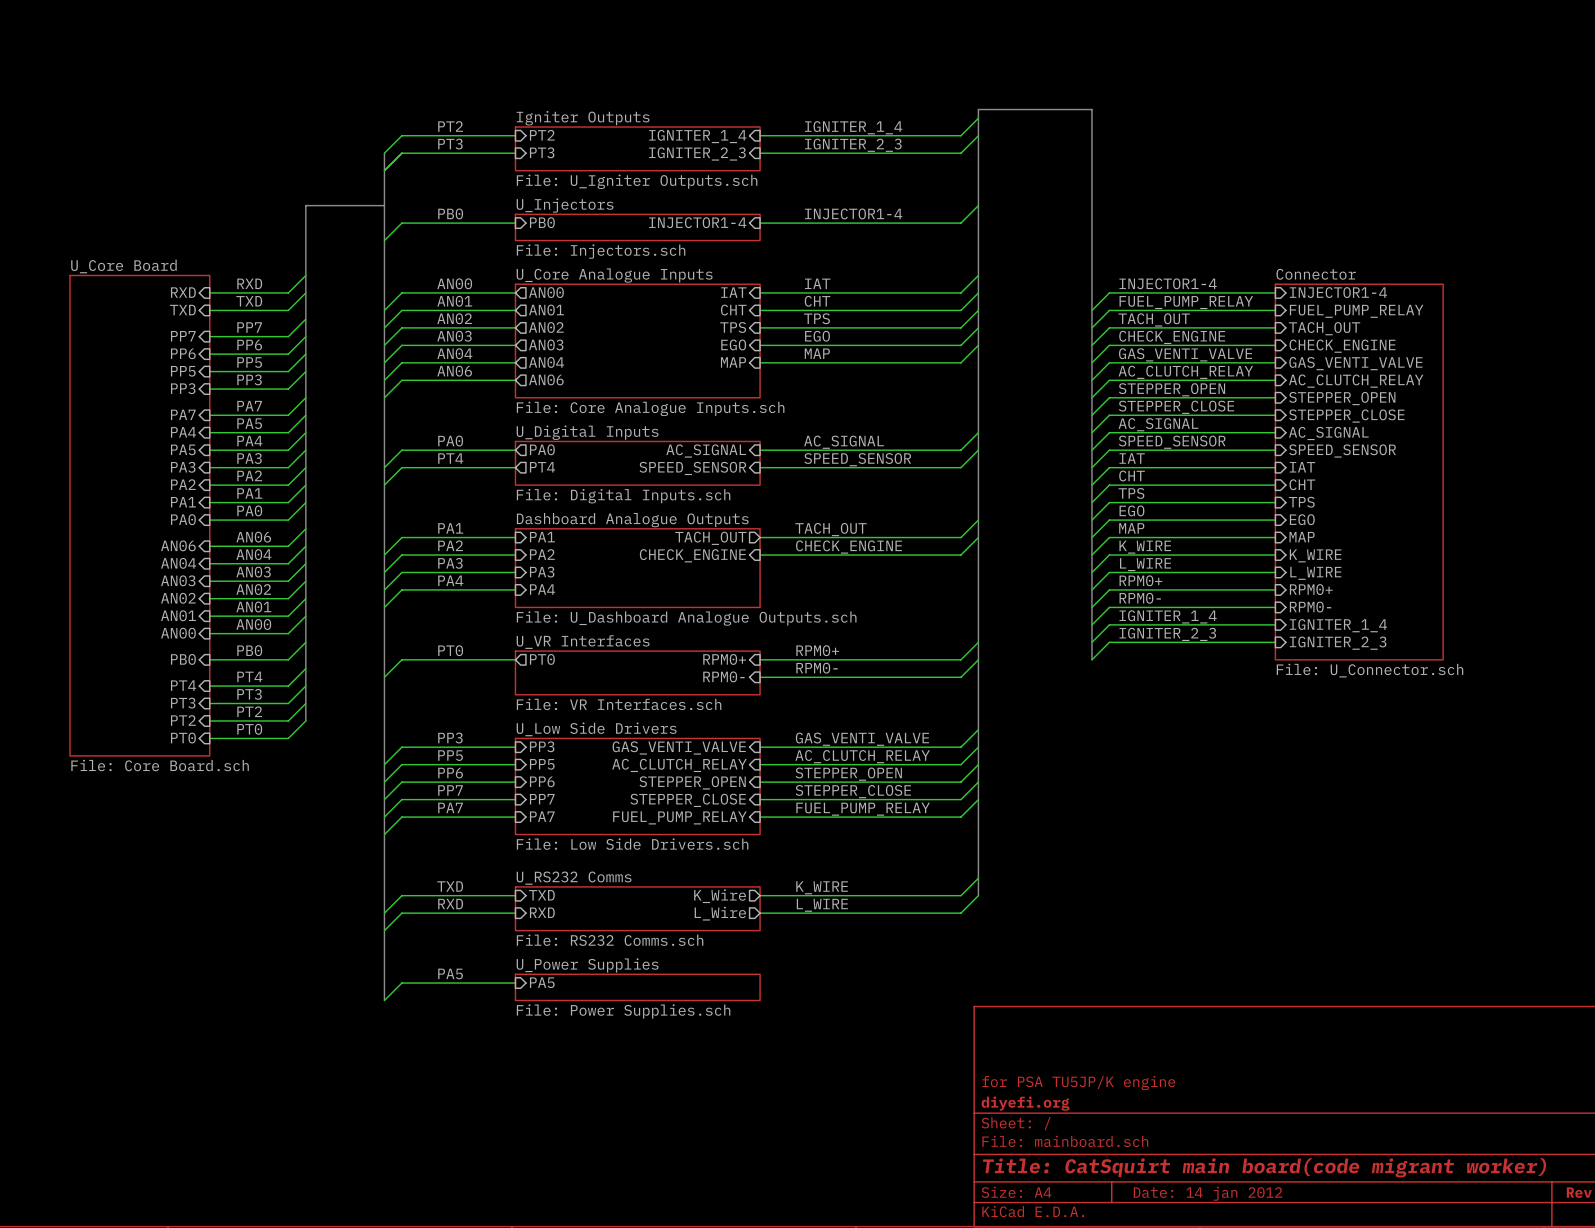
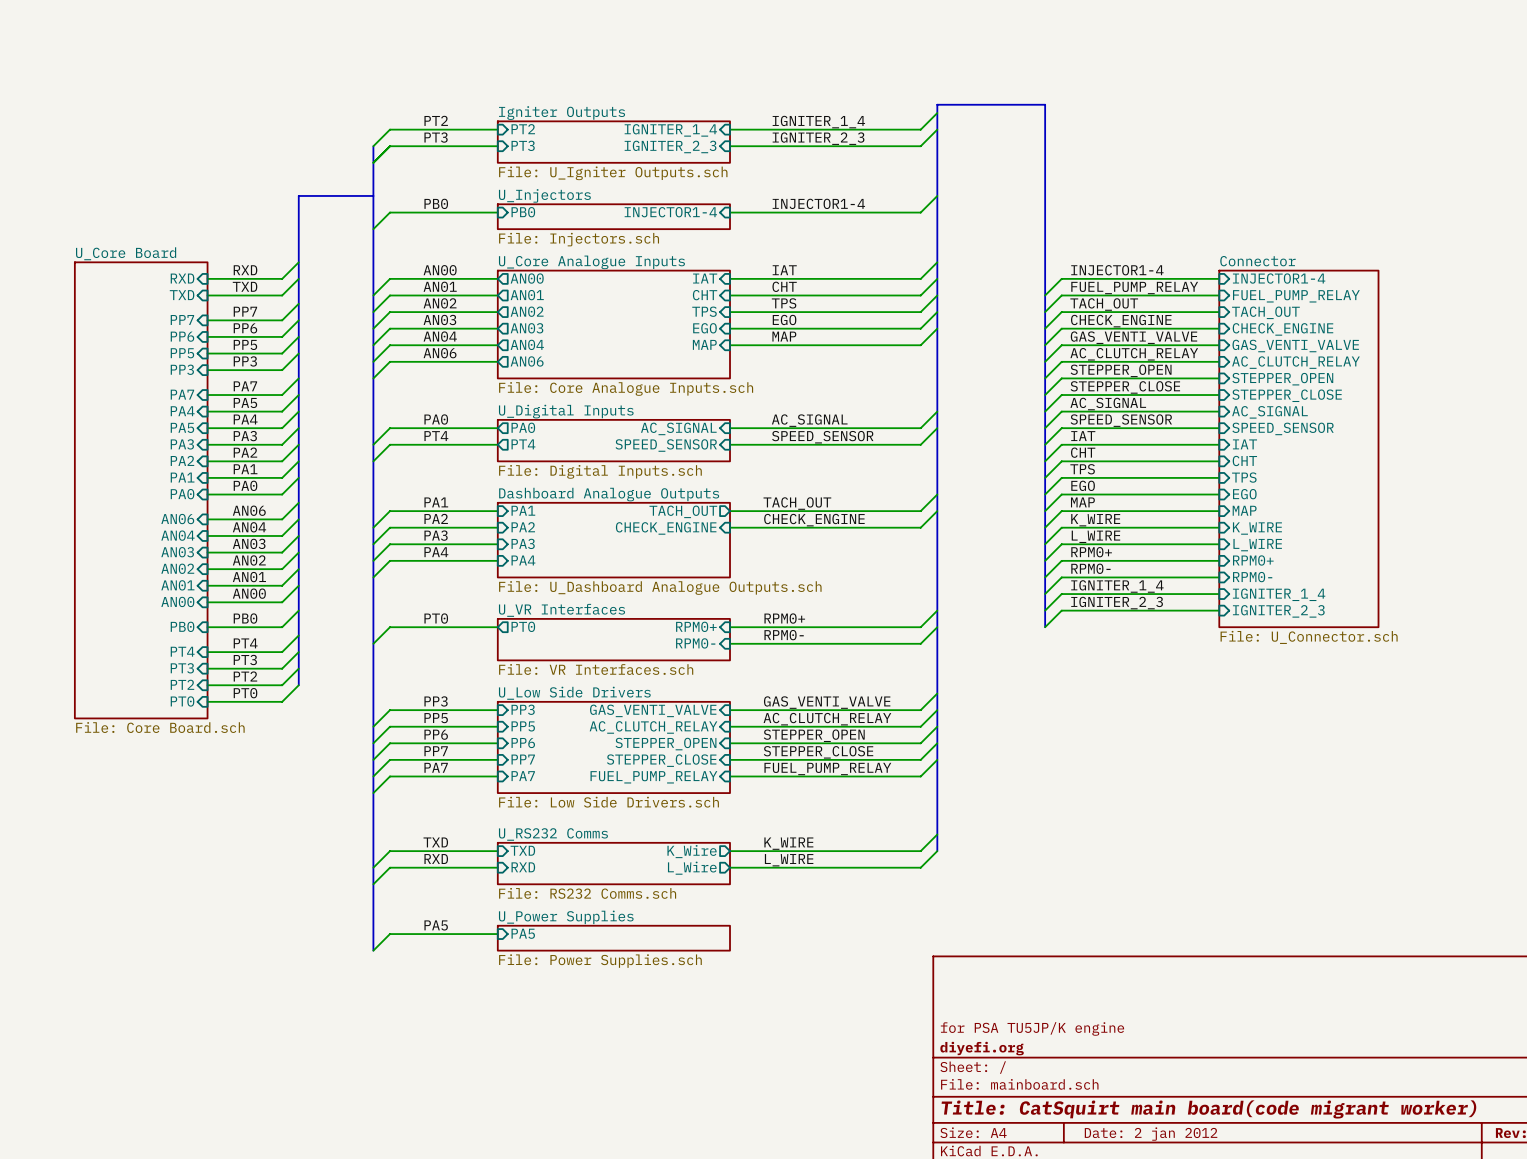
title block: Date: 14 jan 2012 (1207, 1193) -> Date: 2 jan 2012 (1151, 1134)

